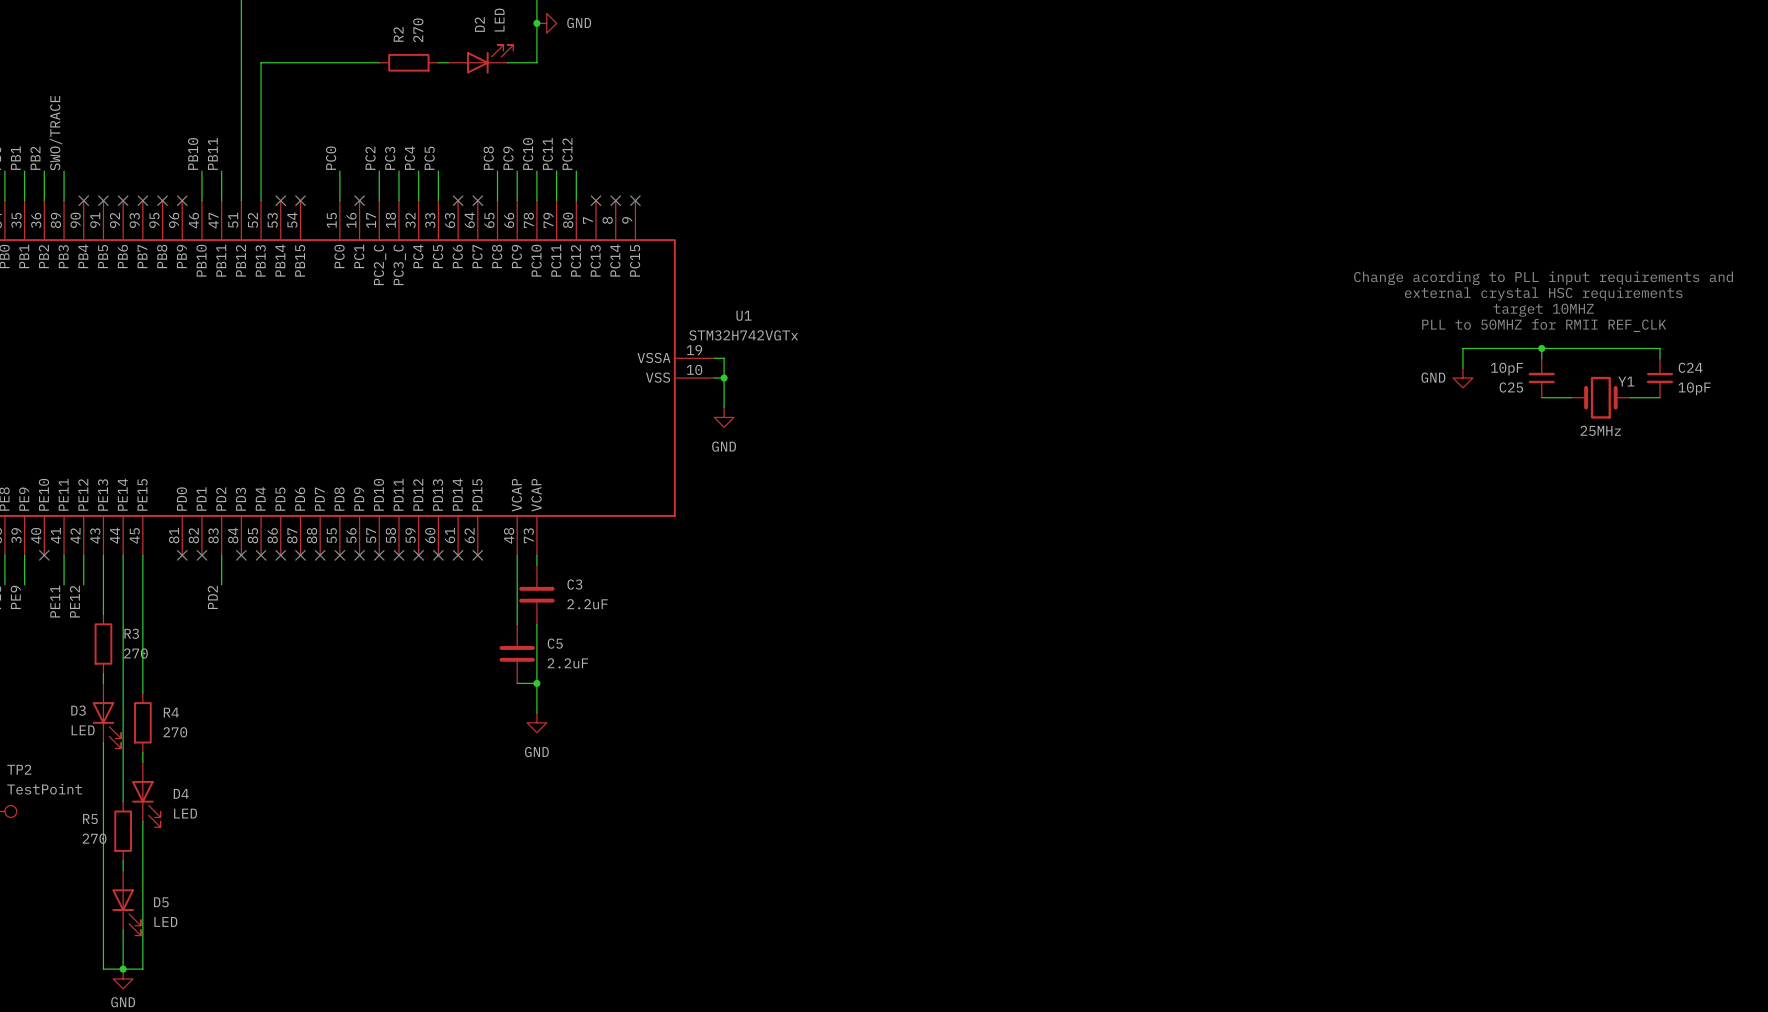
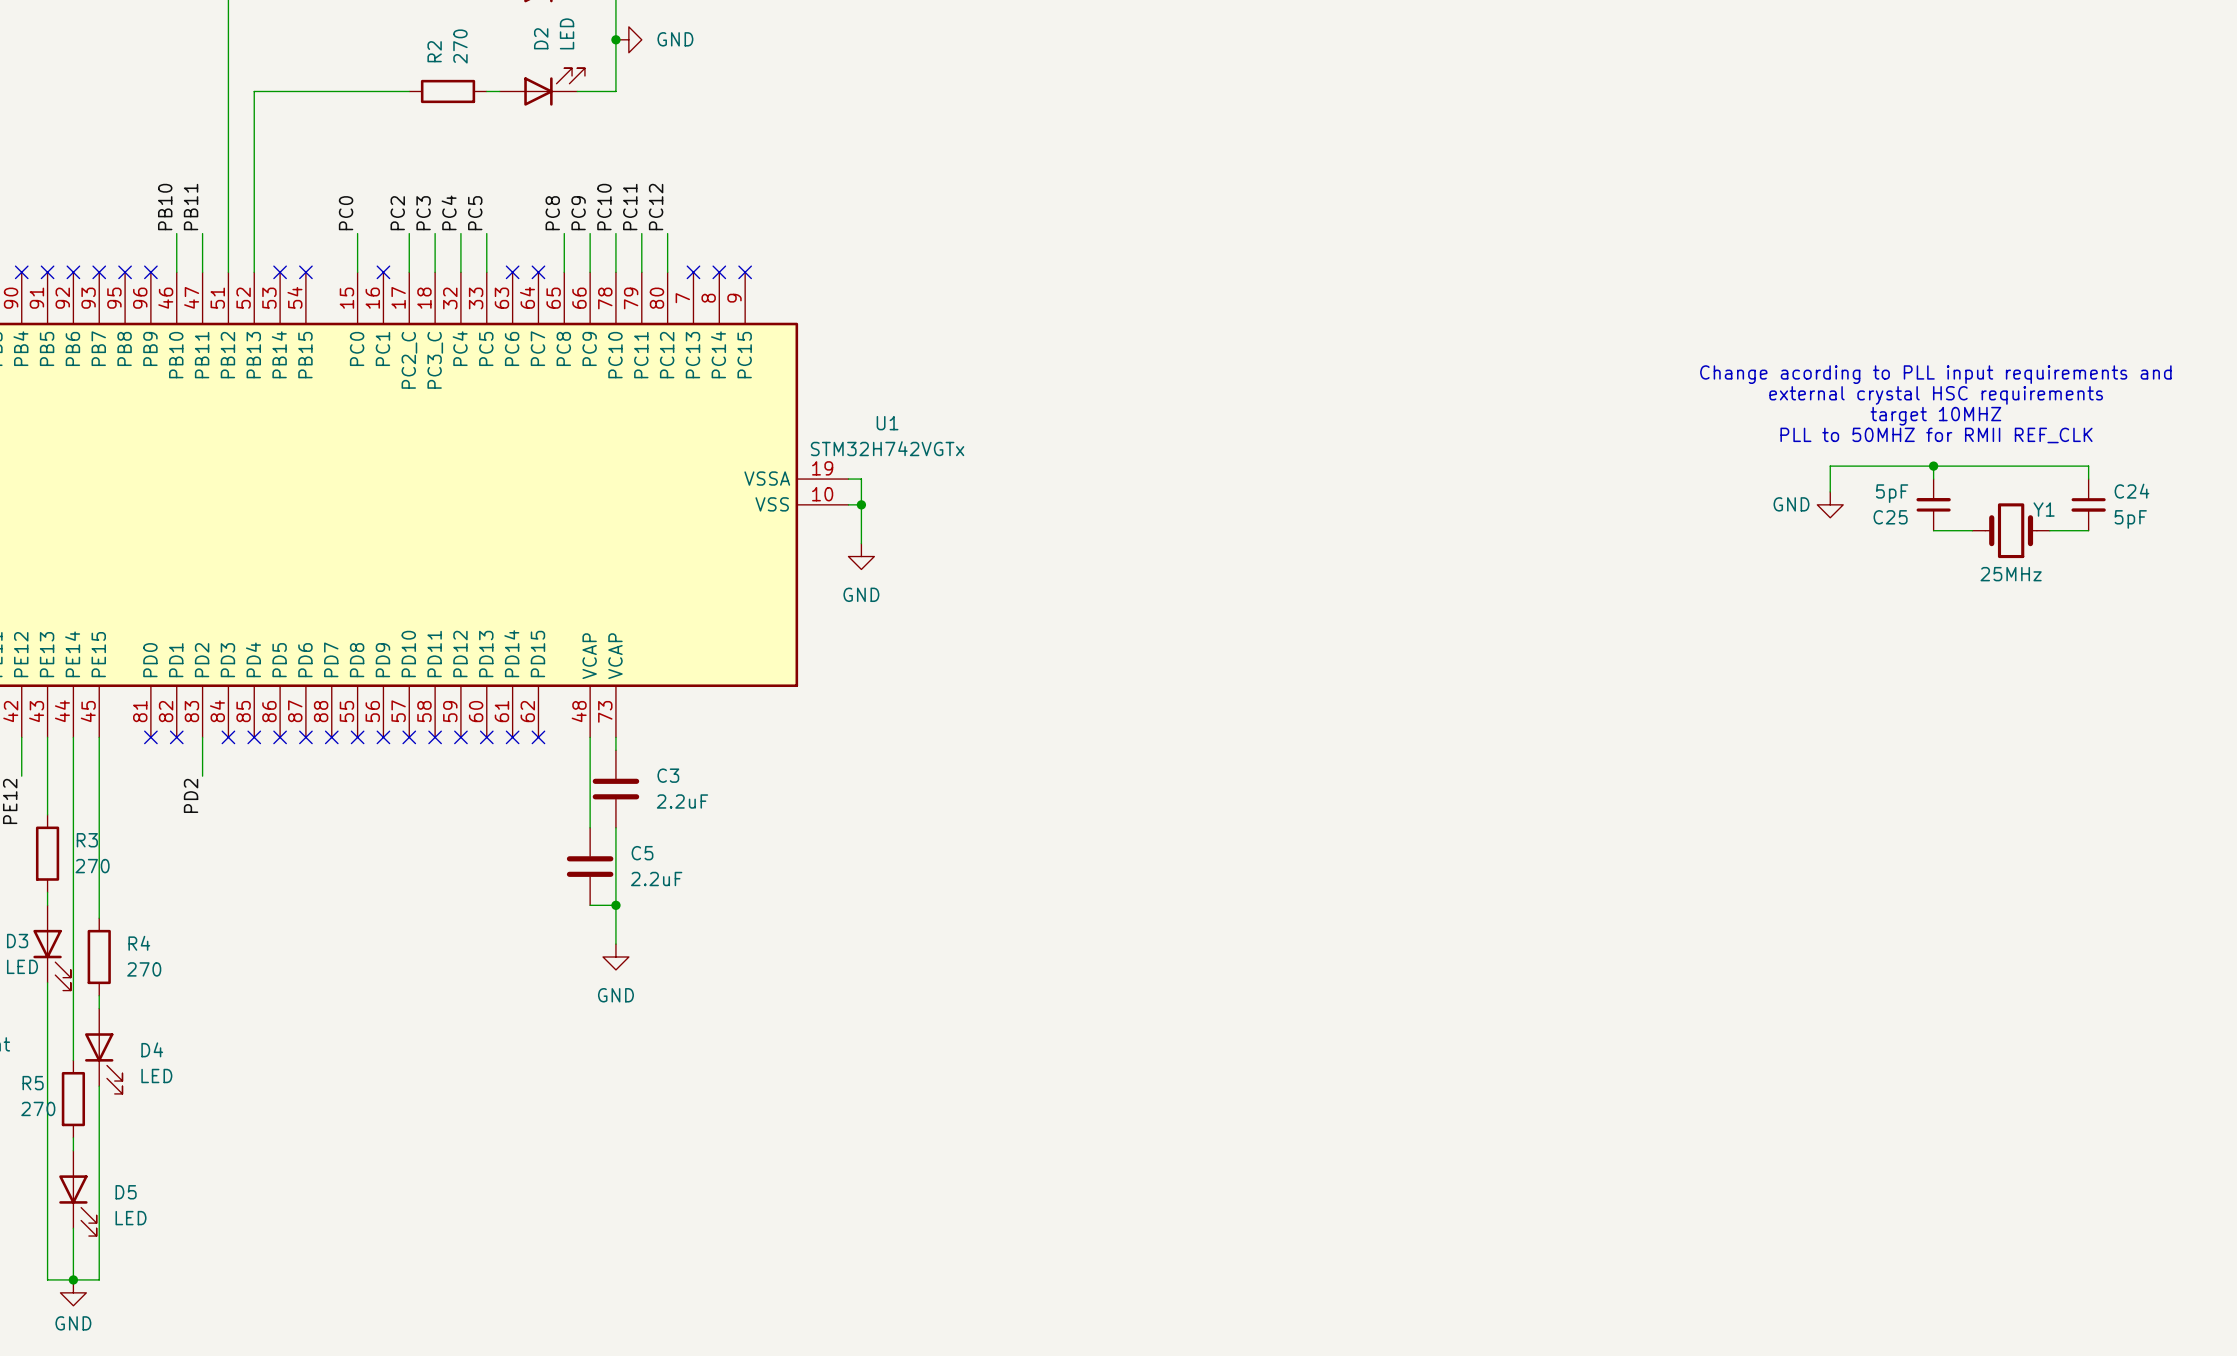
C25 value: 10pF (1506, 369) -> 5pF (1892, 493)
C24 value: 10pF (1694, 388) -> 5pF (2130, 519)

